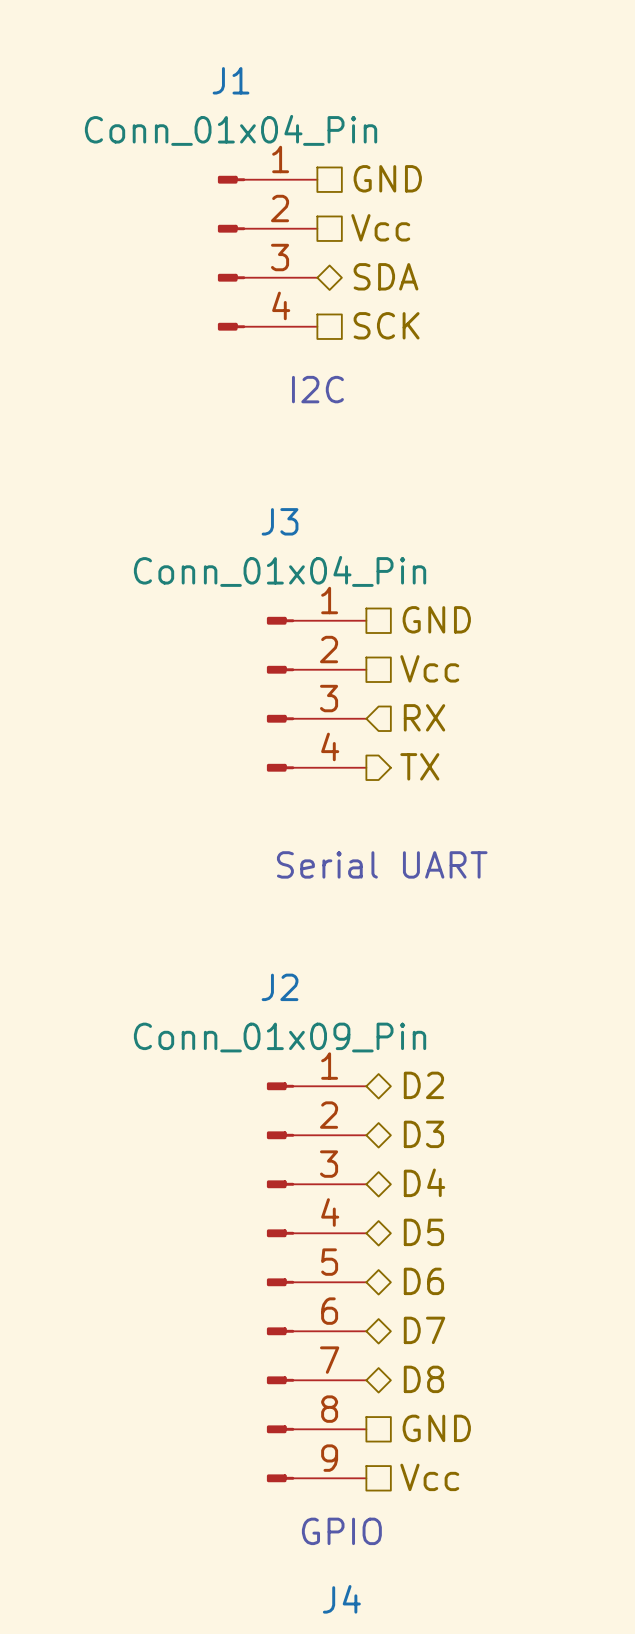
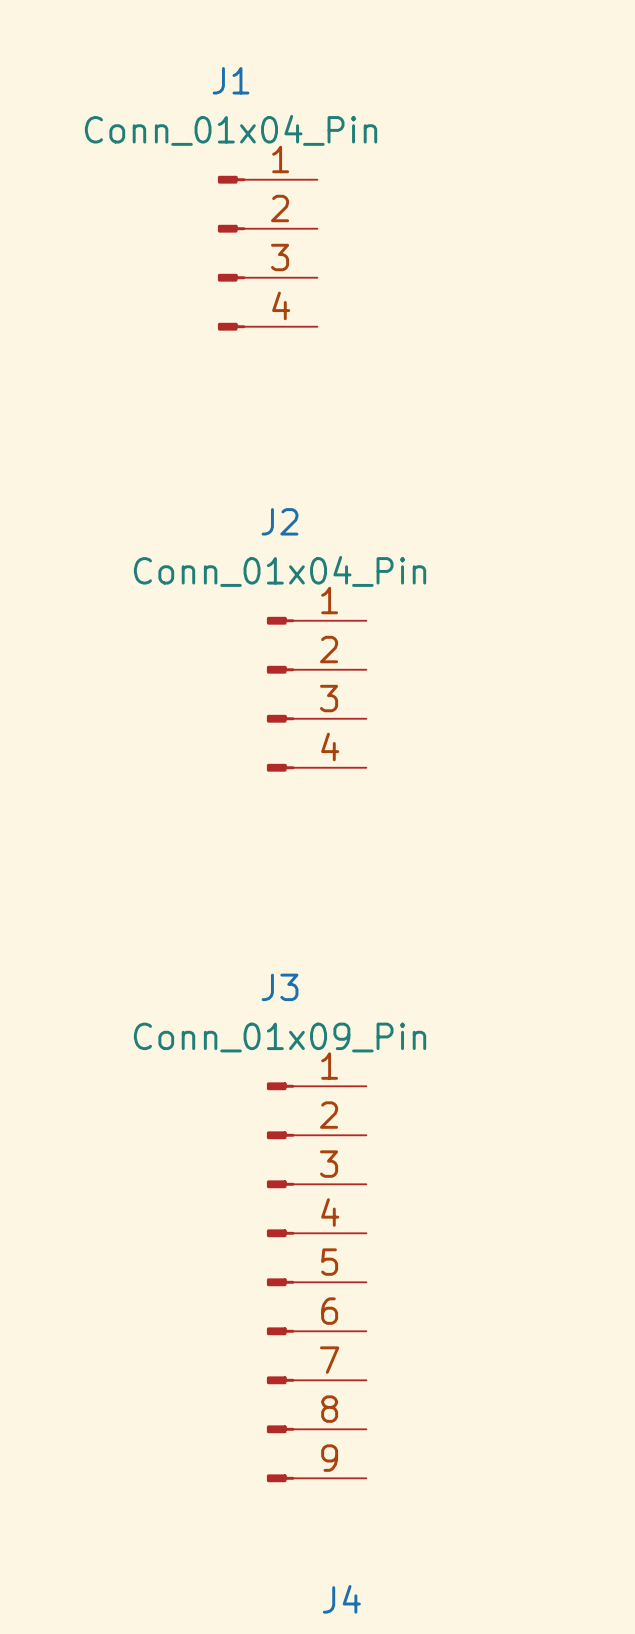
hierarchical label: GND (387, 178) -> none
hierarchical label: Vcc (380, 227) -> none
hierarchical label: SDA (386, 276) -> none
hierarchical label: SCK (386, 325) -> none
text: I2C (317, 389) -> none
J3 name: J3 (280, 521) -> J2 (280, 521)
hierarchical label: GND (436, 619) -> none
hierarchical label: Vcc (429, 668) -> none
hierarchical label: RX (424, 717) -> none
hierarchical label: TX (419, 766) -> none
text: Serial UART (382, 864) -> none
J2 name: J2 (280, 987) -> J3 (280, 987)
hierarchical label: D2 (423, 1085) -> none
hierarchical label: D3 (423, 1134) -> none
hierarchical label: D4 (424, 1182) -> none
hierarchical label: D5 (423, 1232) -> none
hierarchical label: D6 (423, 1281) -> none
hierarchical label: D7 (424, 1330) -> none
hierarchical label: D8 (423, 1379) -> none
hierarchical label: GND (436, 1428) -> none
hierarchical label: Vcc (429, 1477) -> none
text: GPIO (341, 1531) -> none

